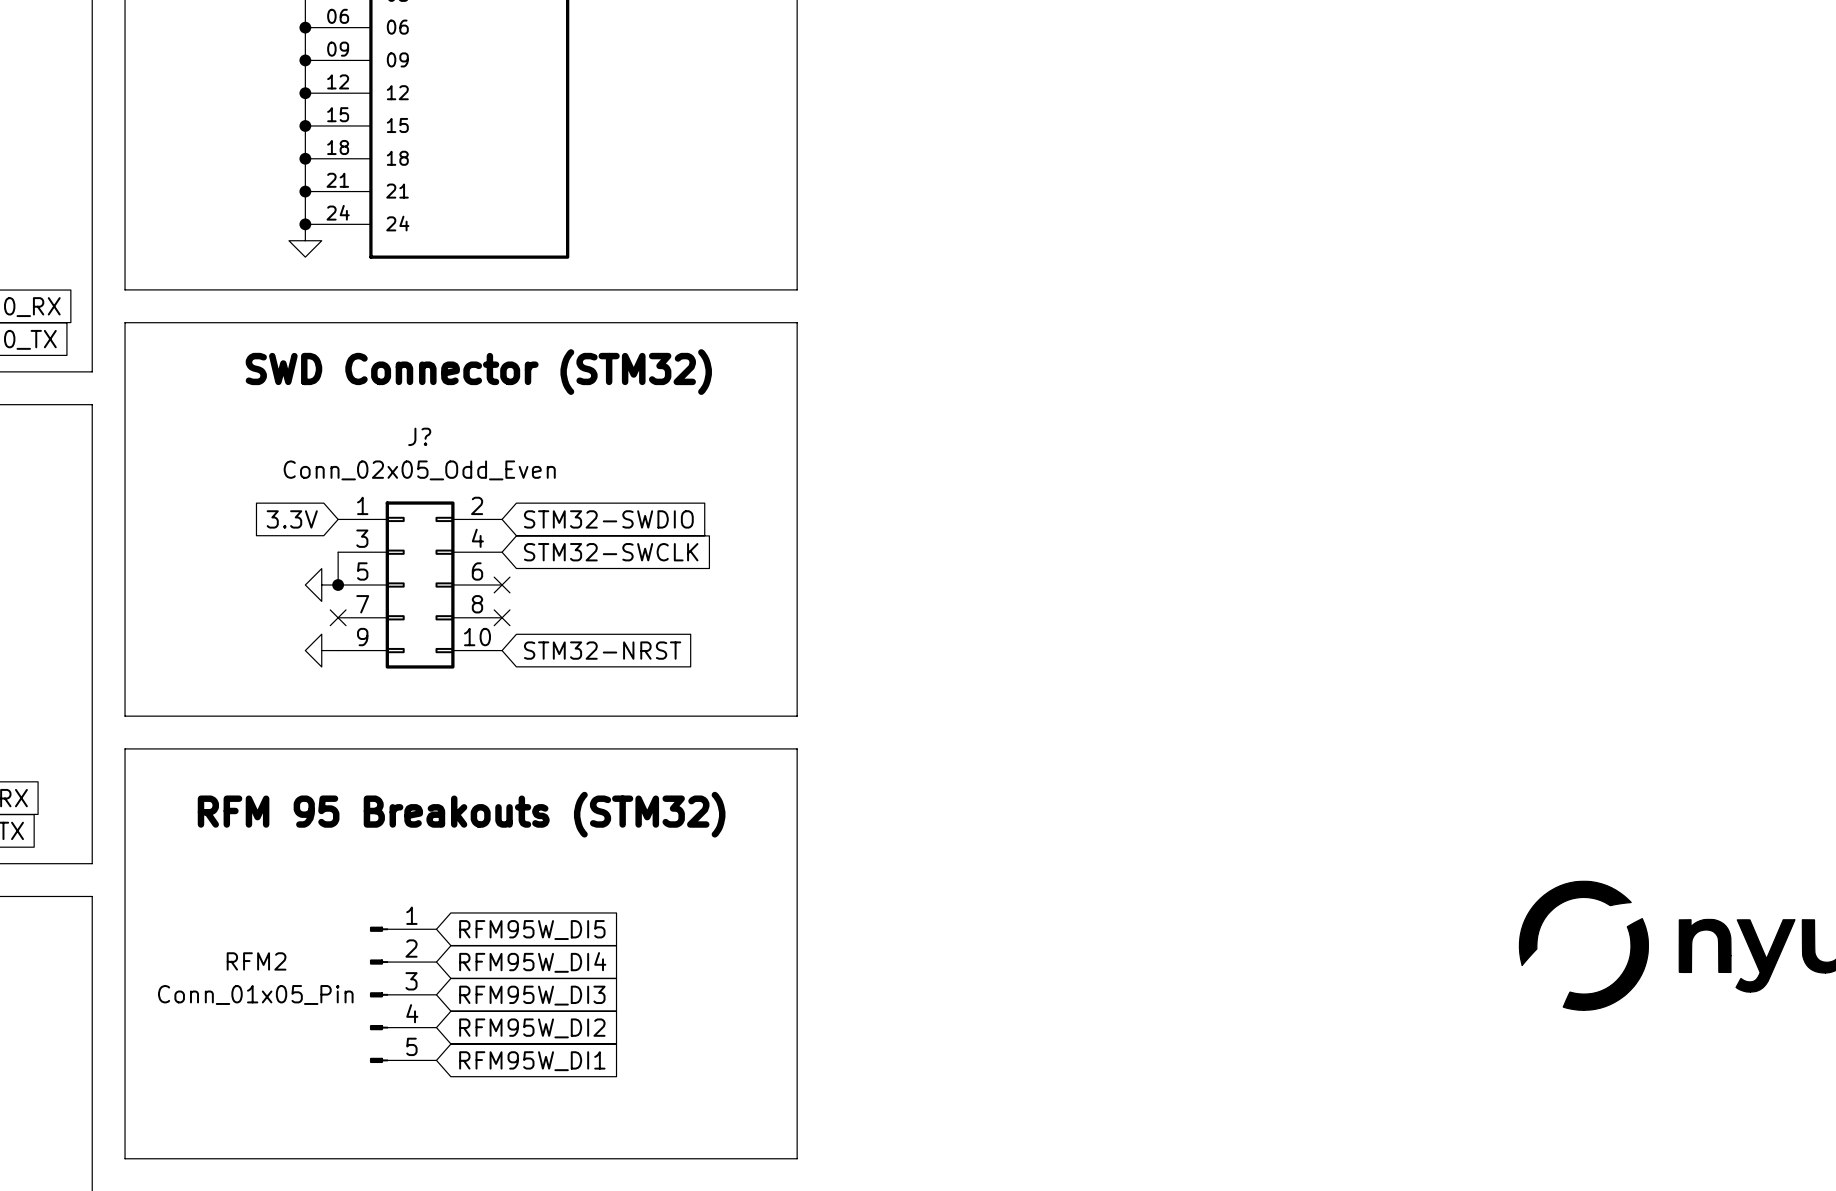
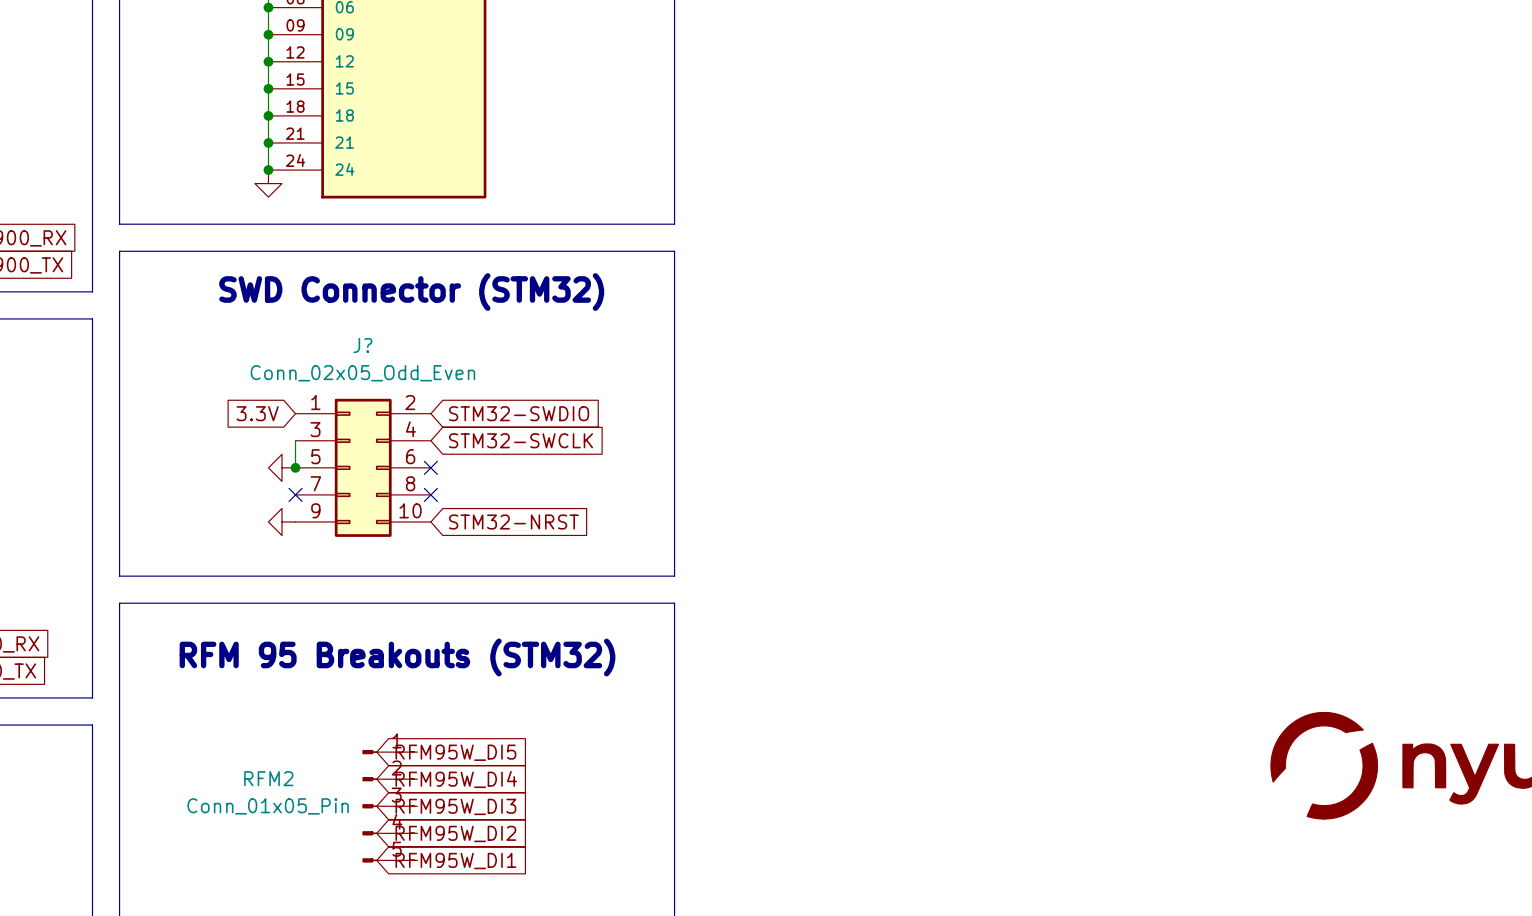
RFM2 position: (403, 994) -> (389, 806)

